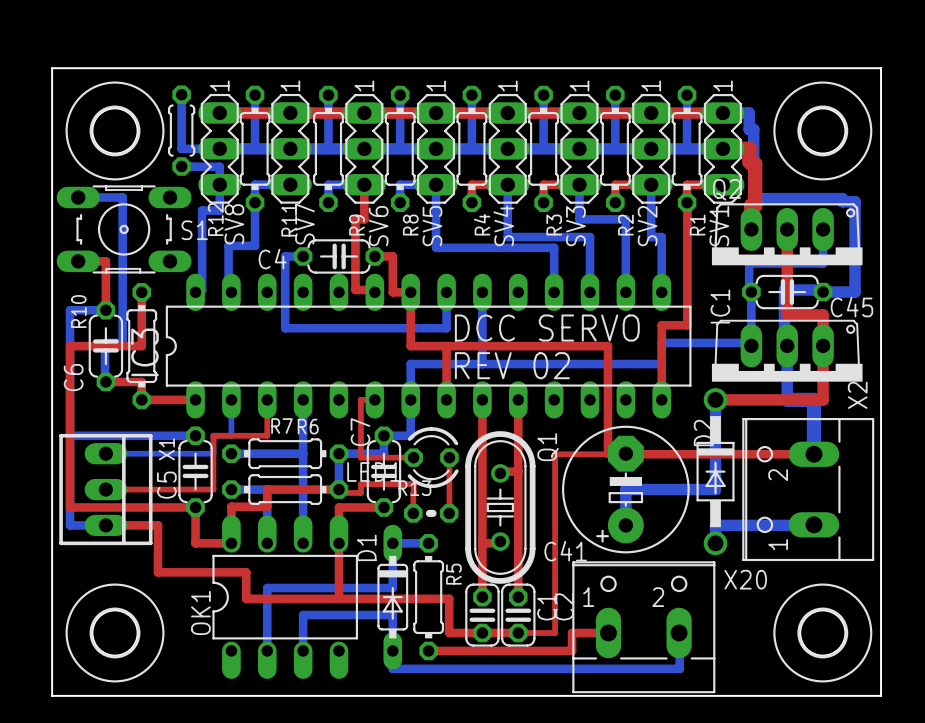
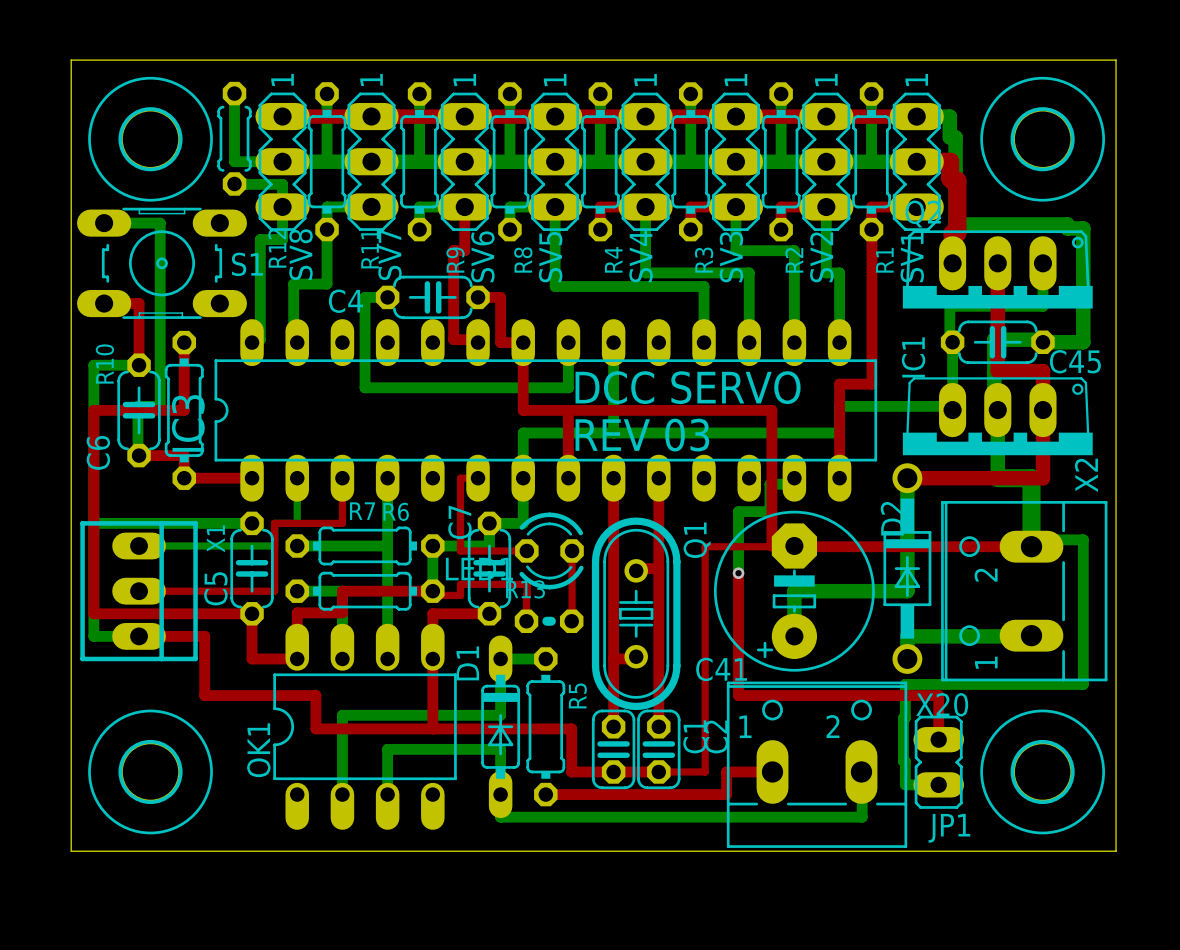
text: REV 02 (512, 365) -> REV 03 (642, 435)
bottom track: none -> (794, 478) (794, 484) (769, 484) (769, 511) (738, 511) (738, 573)
bottom track: none -> (1031, 546) (1031, 539) (1083, 539) (1083, 684) (905, 684) (905, 717) (903, 717) (905, 784) (938, 784)
top track: none -> (738, 573) (738, 695) (938, 695) (938, 739)
via: none -> (738, 573)
JP1: none -> (938, 762)

